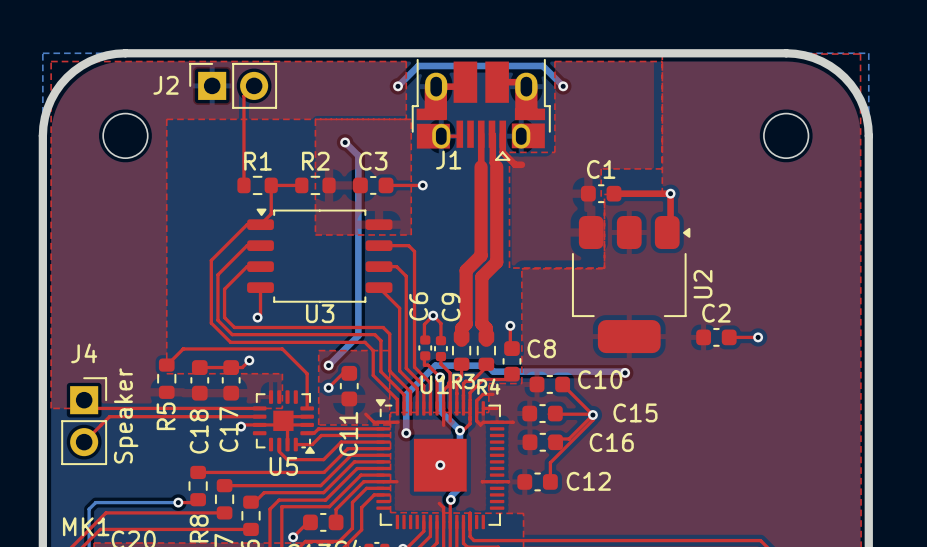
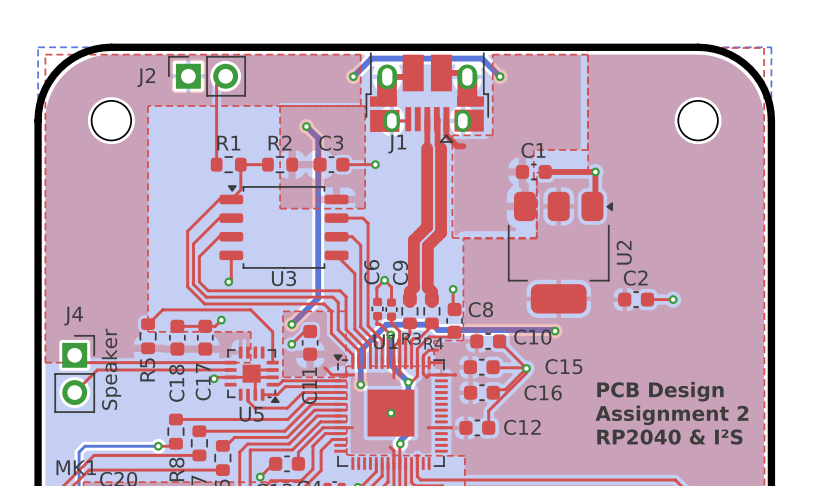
text: none -> PCB Design (660, 391)
text: none -> Assignment 2 (671, 415)
text: none -> RP2040 & I²S (669, 437)

